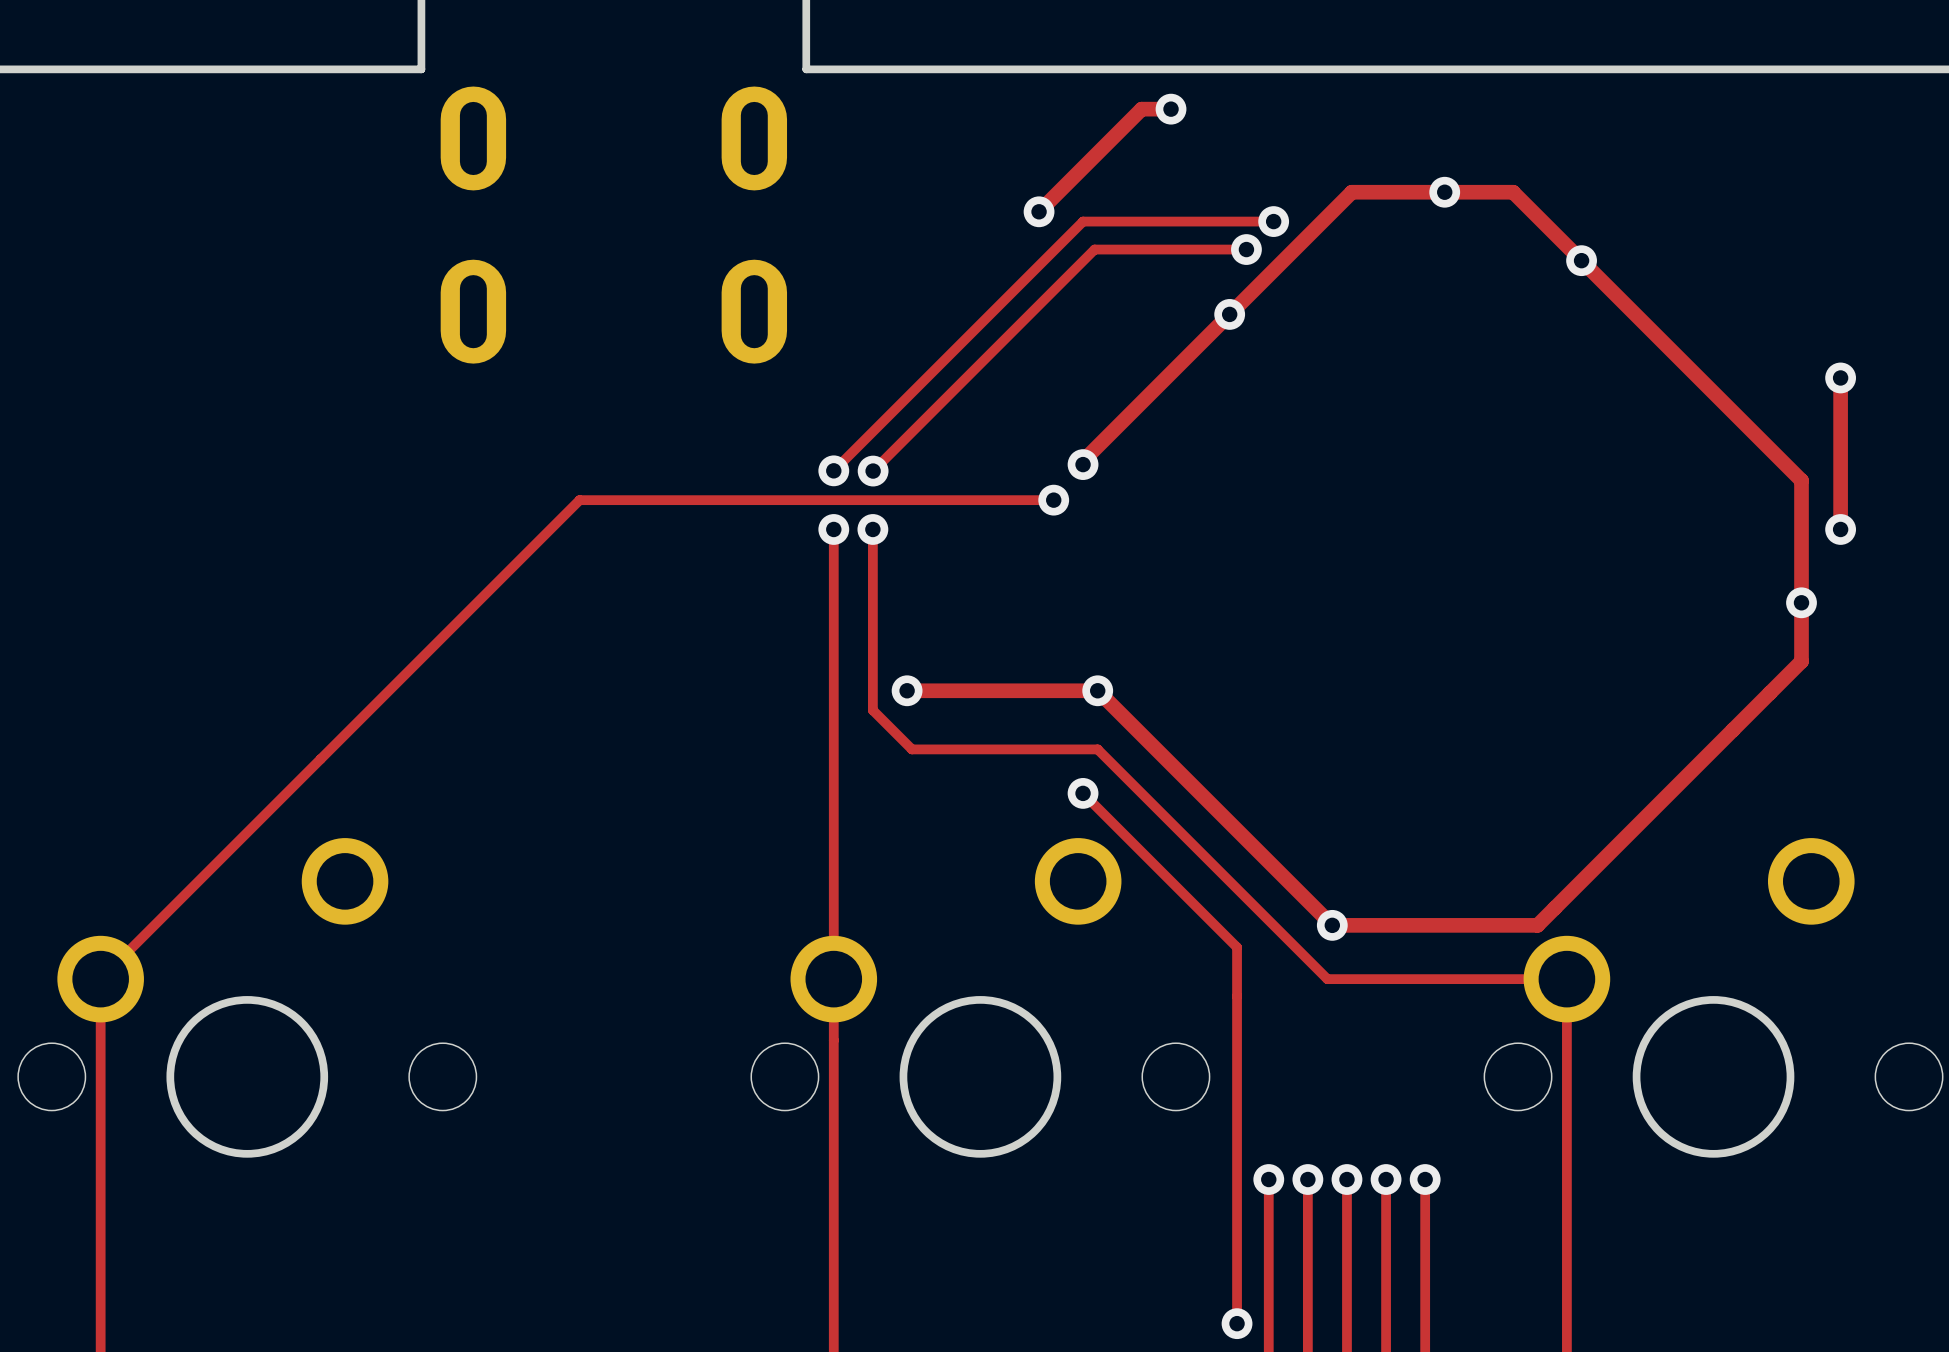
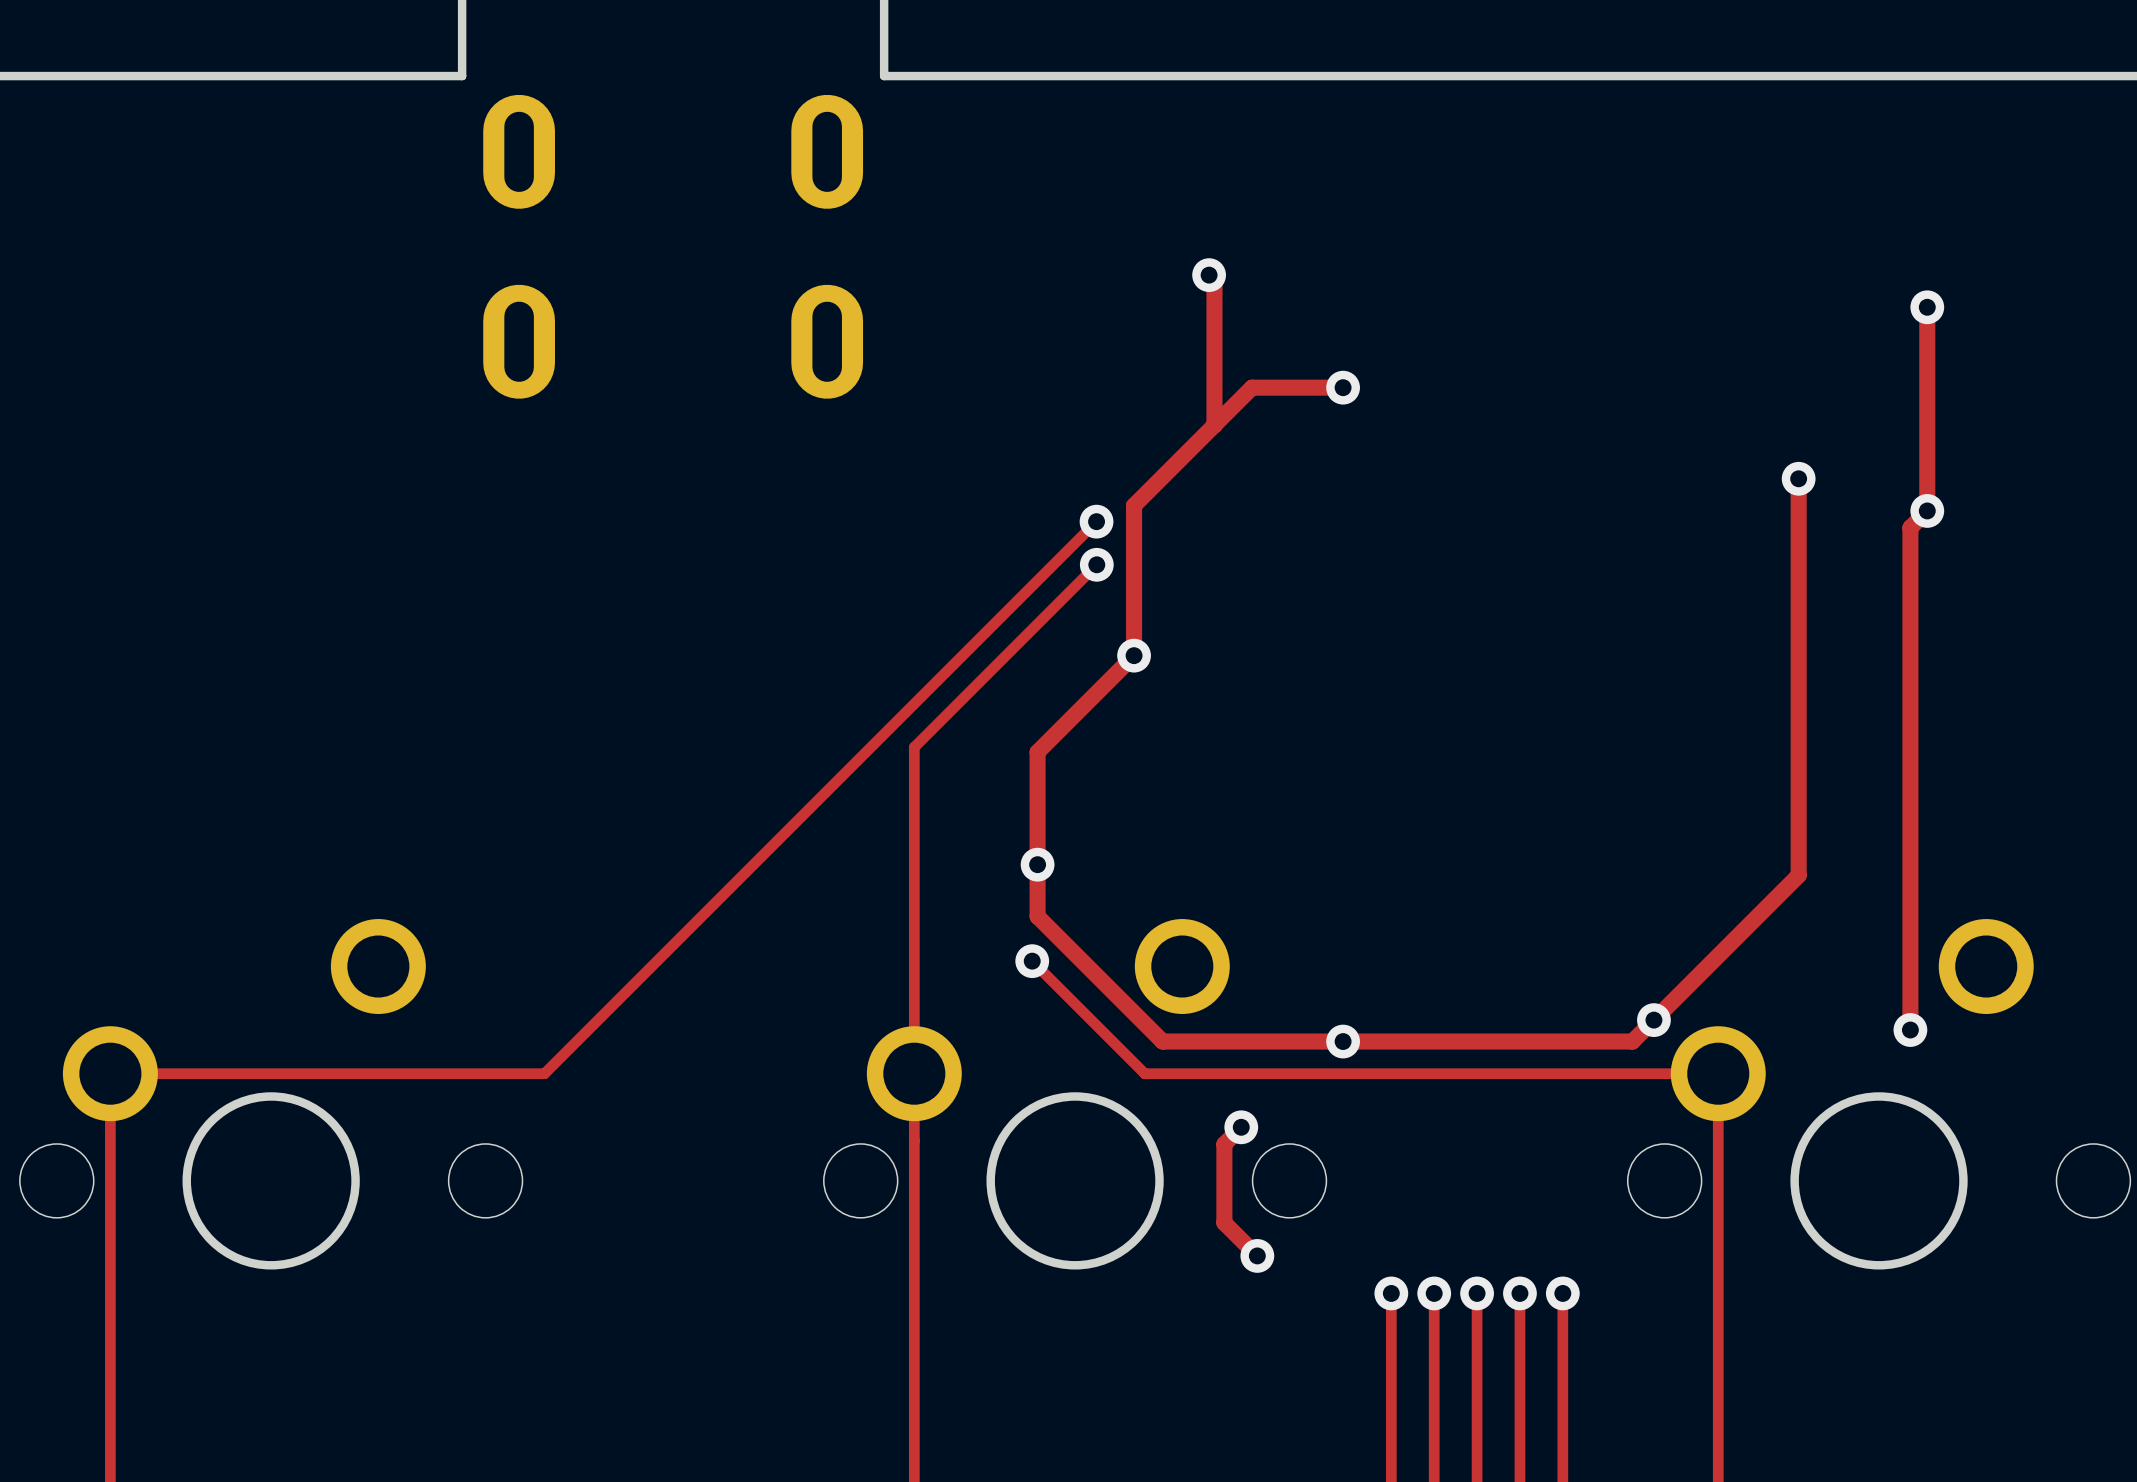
track: (1171, 109) (1141, 109) (1039, 211) -> none
via: (1171, 109) -> none
via: (1444, 192) -> none
via: (1039, 211) -> none
track: (1273, 221) (1083, 221) (833, 470) -> none
via: (1273, 221) -> none
track: (1246, 249) (1094, 249) (873, 471) -> none
via: (1246, 249) -> none
track: none -> (1209, 275) (1214, 280) (1214, 425)
via: none -> (1209, 275)
via: (1581, 260) -> none
track: none -> (1927, 307) (1927, 510) (1910, 527) (1910, 1030)
via: none -> (1927, 307)
via position: (1229, 314) -> (1343, 387)
track: none -> (1343, 387) (1251, 387) (1134, 505) (1134, 655) (1037, 752) (1037, 916) (1162, 1041) (1632, 1041) (1798, 875) (1798, 478)
track: (1840, 377) (1840, 529) -> none
via: (1840, 377) -> none
via: none -> (1798, 478)
track: (1083, 464) (1083, 461) (1351, 192) (1513, 192) (1801, 480) (1801, 661) (1537, 925) (1332, 925) (1097, 690) (907, 690) -> none
via: (1083, 464) -> none
via: none -> (1927, 510)
via: (833, 470) -> none
via: (873, 471) -> none
via: none -> (1096, 521)
track: (1053, 500) (579, 500) (100, 979) -> (1096, 521) (544, 1073) (110, 1073)
via: (1053, 500) -> none
via: none -> (1096, 564)
track: (833, 529) (833, 681) -> (1096, 564) (914, 747)
via: (833, 529) -> none
track: (872, 529) (872, 710) (911, 749) (1097, 749) (1327, 979) -> (1032, 961) (1144, 1073) (1455, 1073)
via: (872, 529) -> none
via: (1840, 529) -> none
via: none -> (1134, 655)
via: (1801, 602) -> none
via: (907, 690) -> none
via: (1097, 690) -> none
via: none -> (1037, 864)
track: (1083, 793) (1237, 947) (1237, 1323) -> none
via: (1083, 793) -> none
via: none -> (1032, 961)
via: (1332, 925) -> none
via: none -> (1653, 1020)
via: none -> (1910, 1030)
via: none -> (1343, 1041)
track: none -> (1241, 1127) (1224, 1144) (1224, 1222) (1257, 1255)
via: none -> (1241, 1127)
via: none -> (1257, 1255)
via: (1237, 1323) -> none

